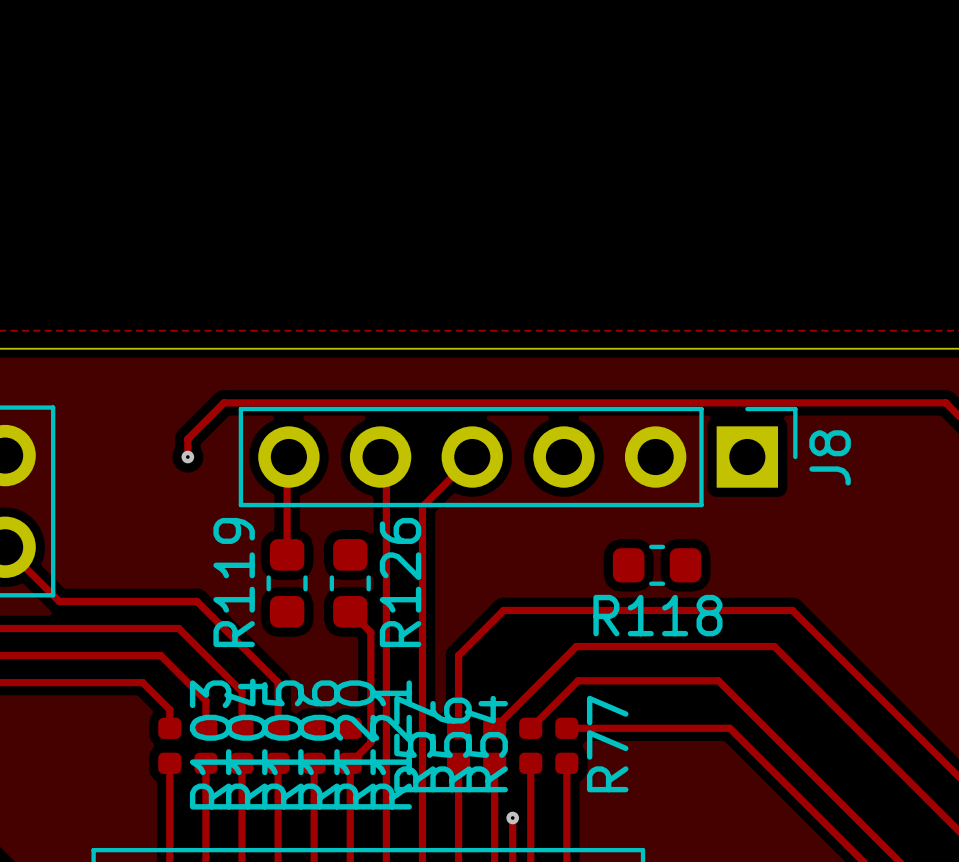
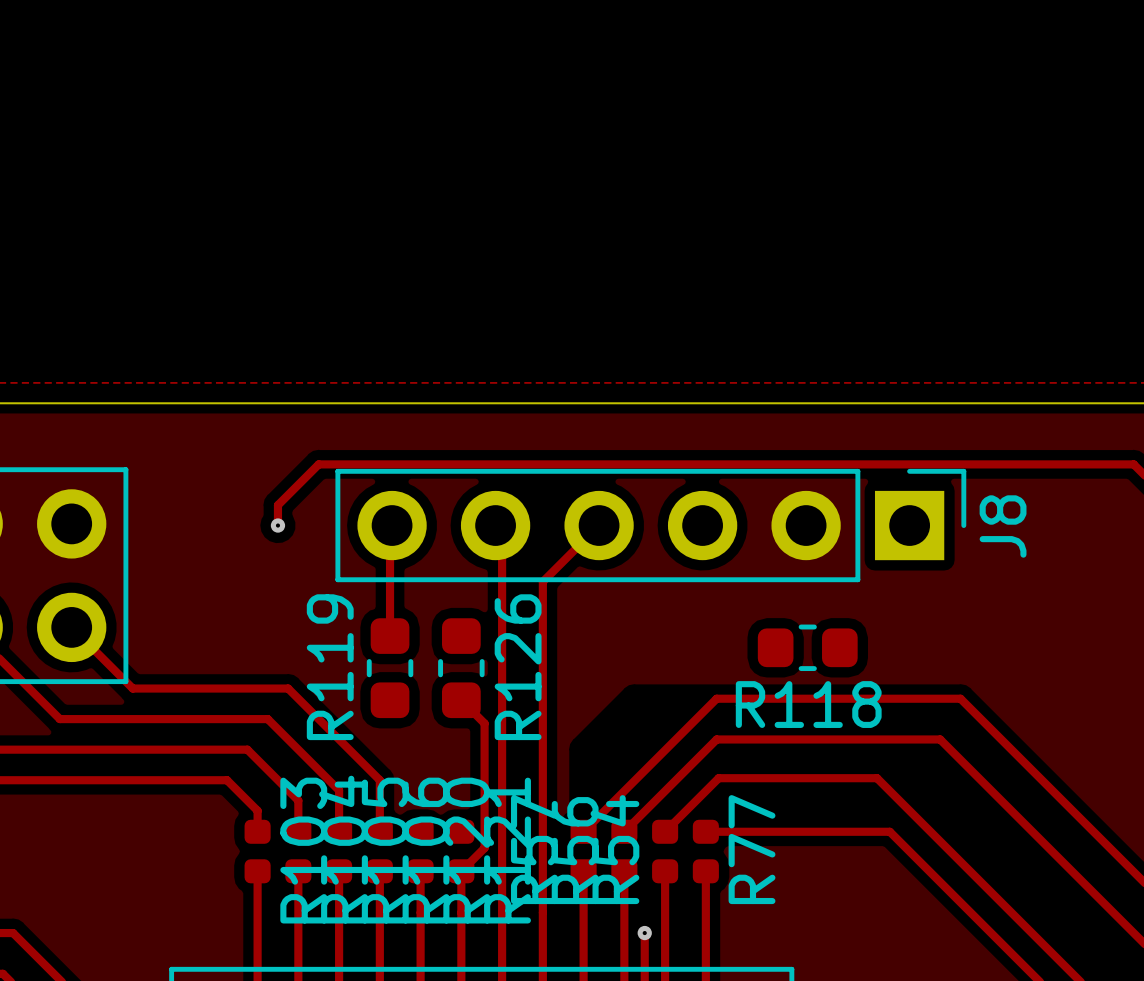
track: (576, 610) (503, 610) (458, 655) (458, 728) -> (716, 698) (583, 831)

